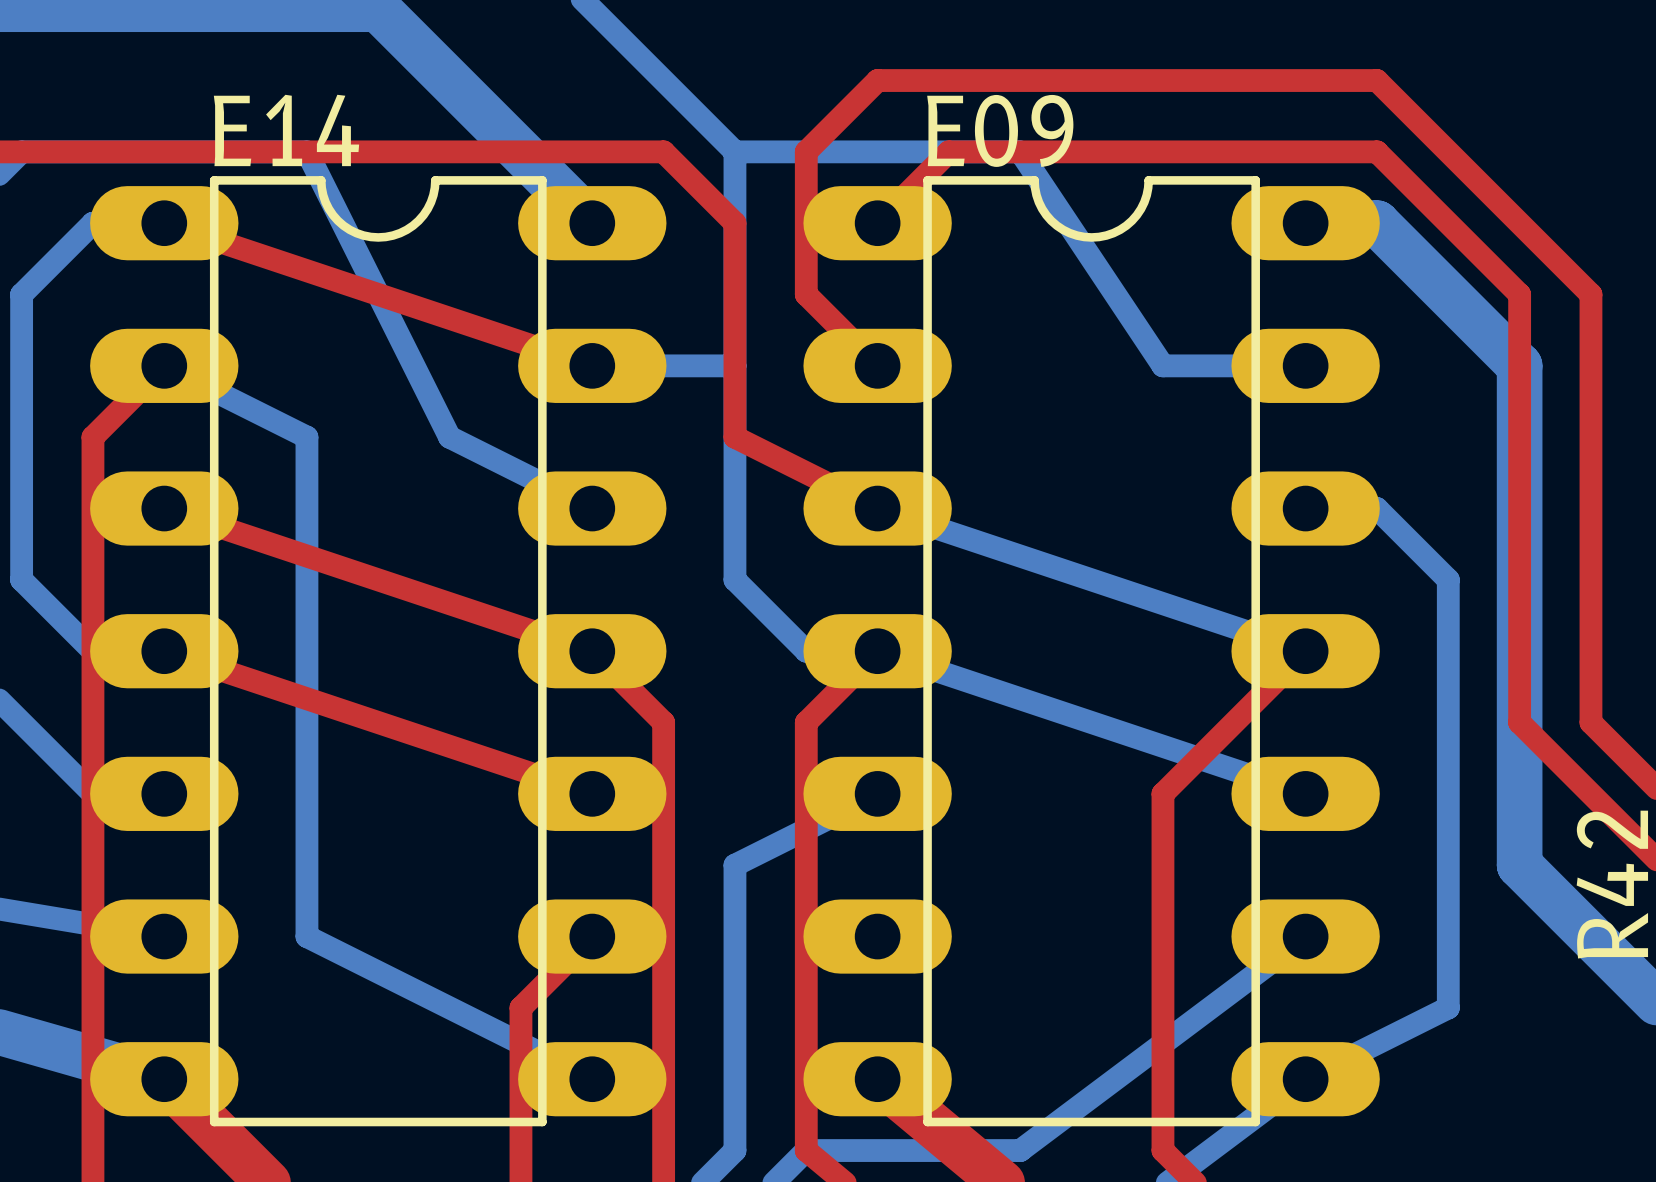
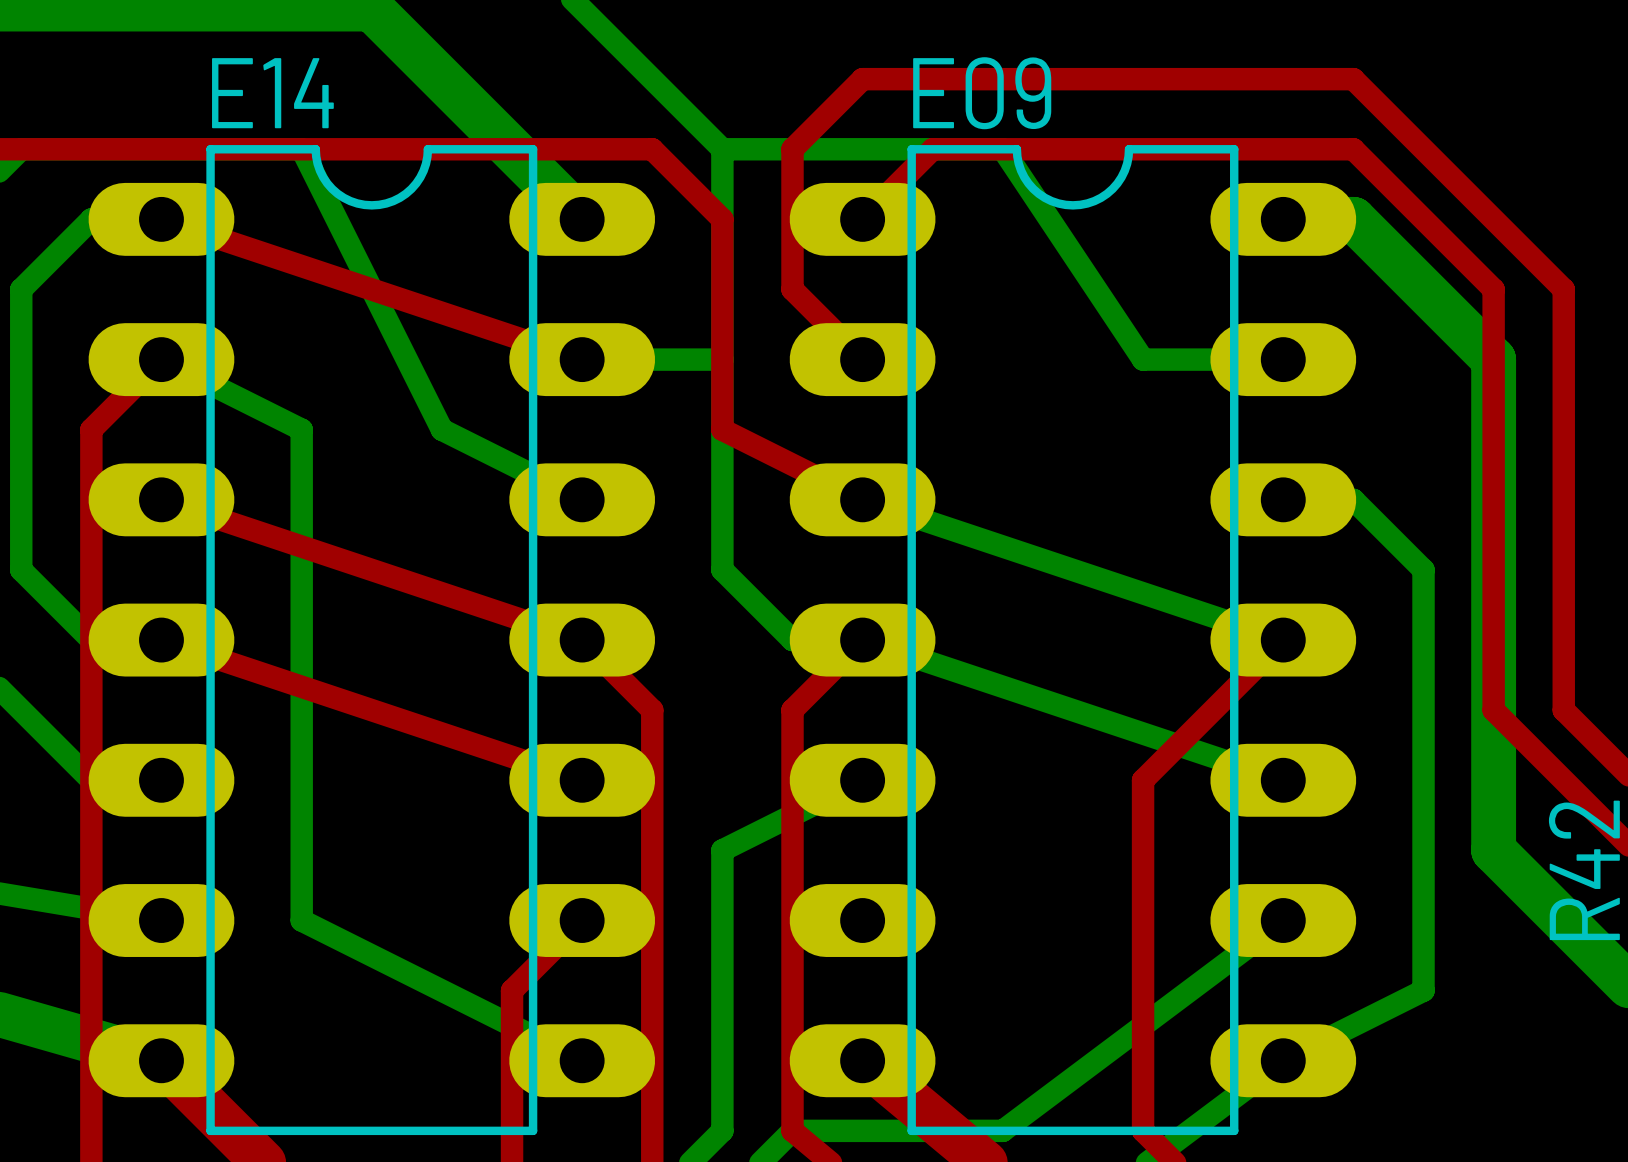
E14 name position: E14 (286, 130) -> E14 (272, 93)
E09 name position: E09 (1000, 130) -> E09 (982, 93)
E14 footprint: [90, 176, 667, 1127] -> [88, 145, 656, 1136]
E09 footprint: [803, 176, 1380, 1127] -> [789, 145, 1357, 1136]

